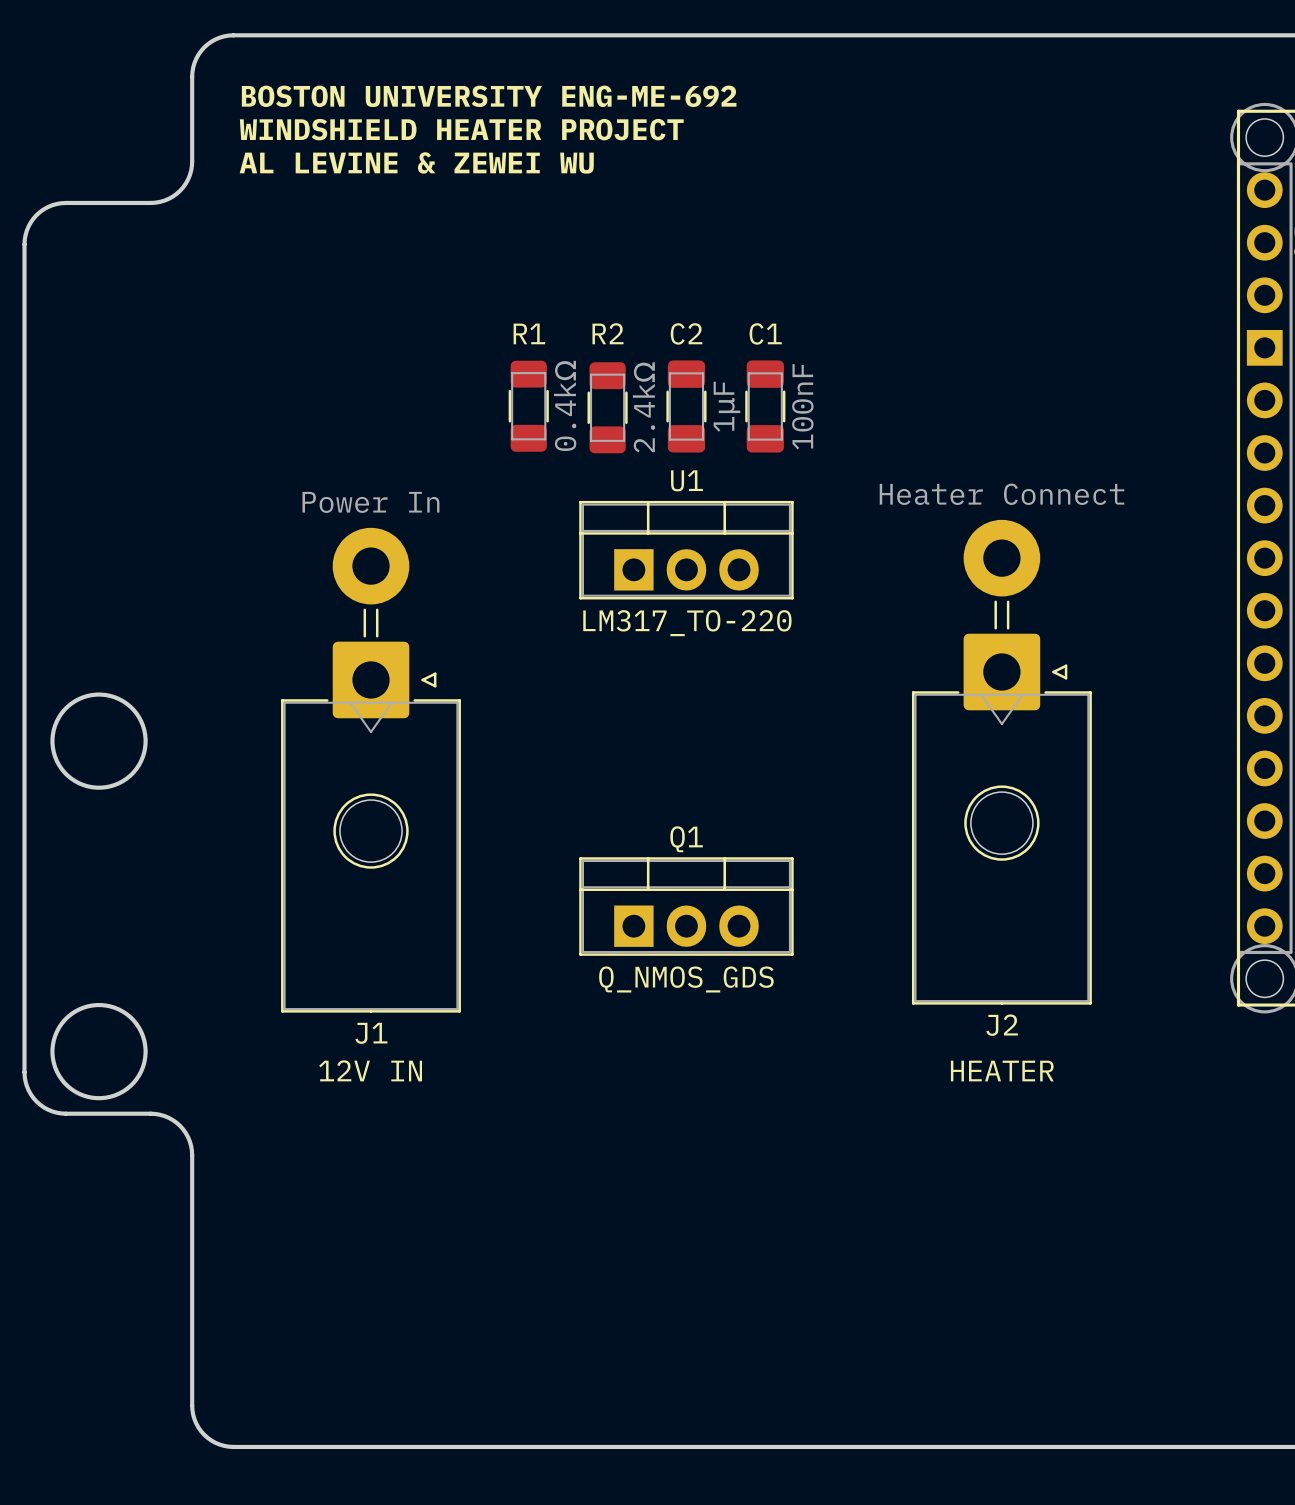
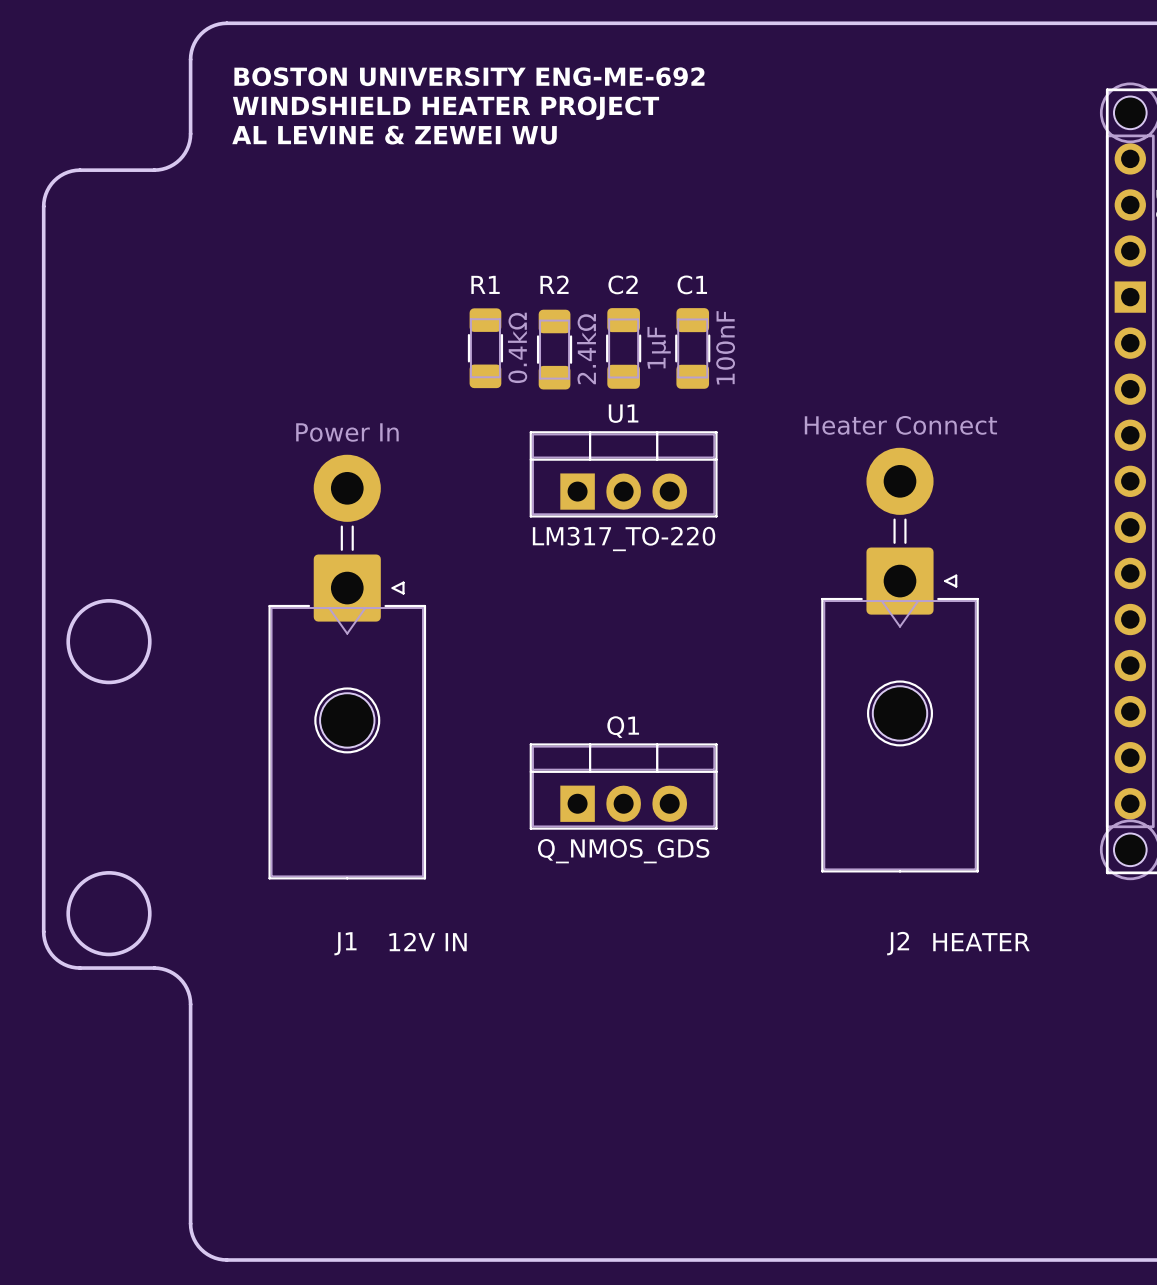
J2 name position: J2 (1002, 1025) -> J2 (898, 943)
J1 name position: J1 (371, 1033) -> J1 (345, 943)
text position: 12V IN (370, 1070) -> 12V IN (428, 942)
text position: HEATER (1002, 1071) -> HEATER (981, 942)

